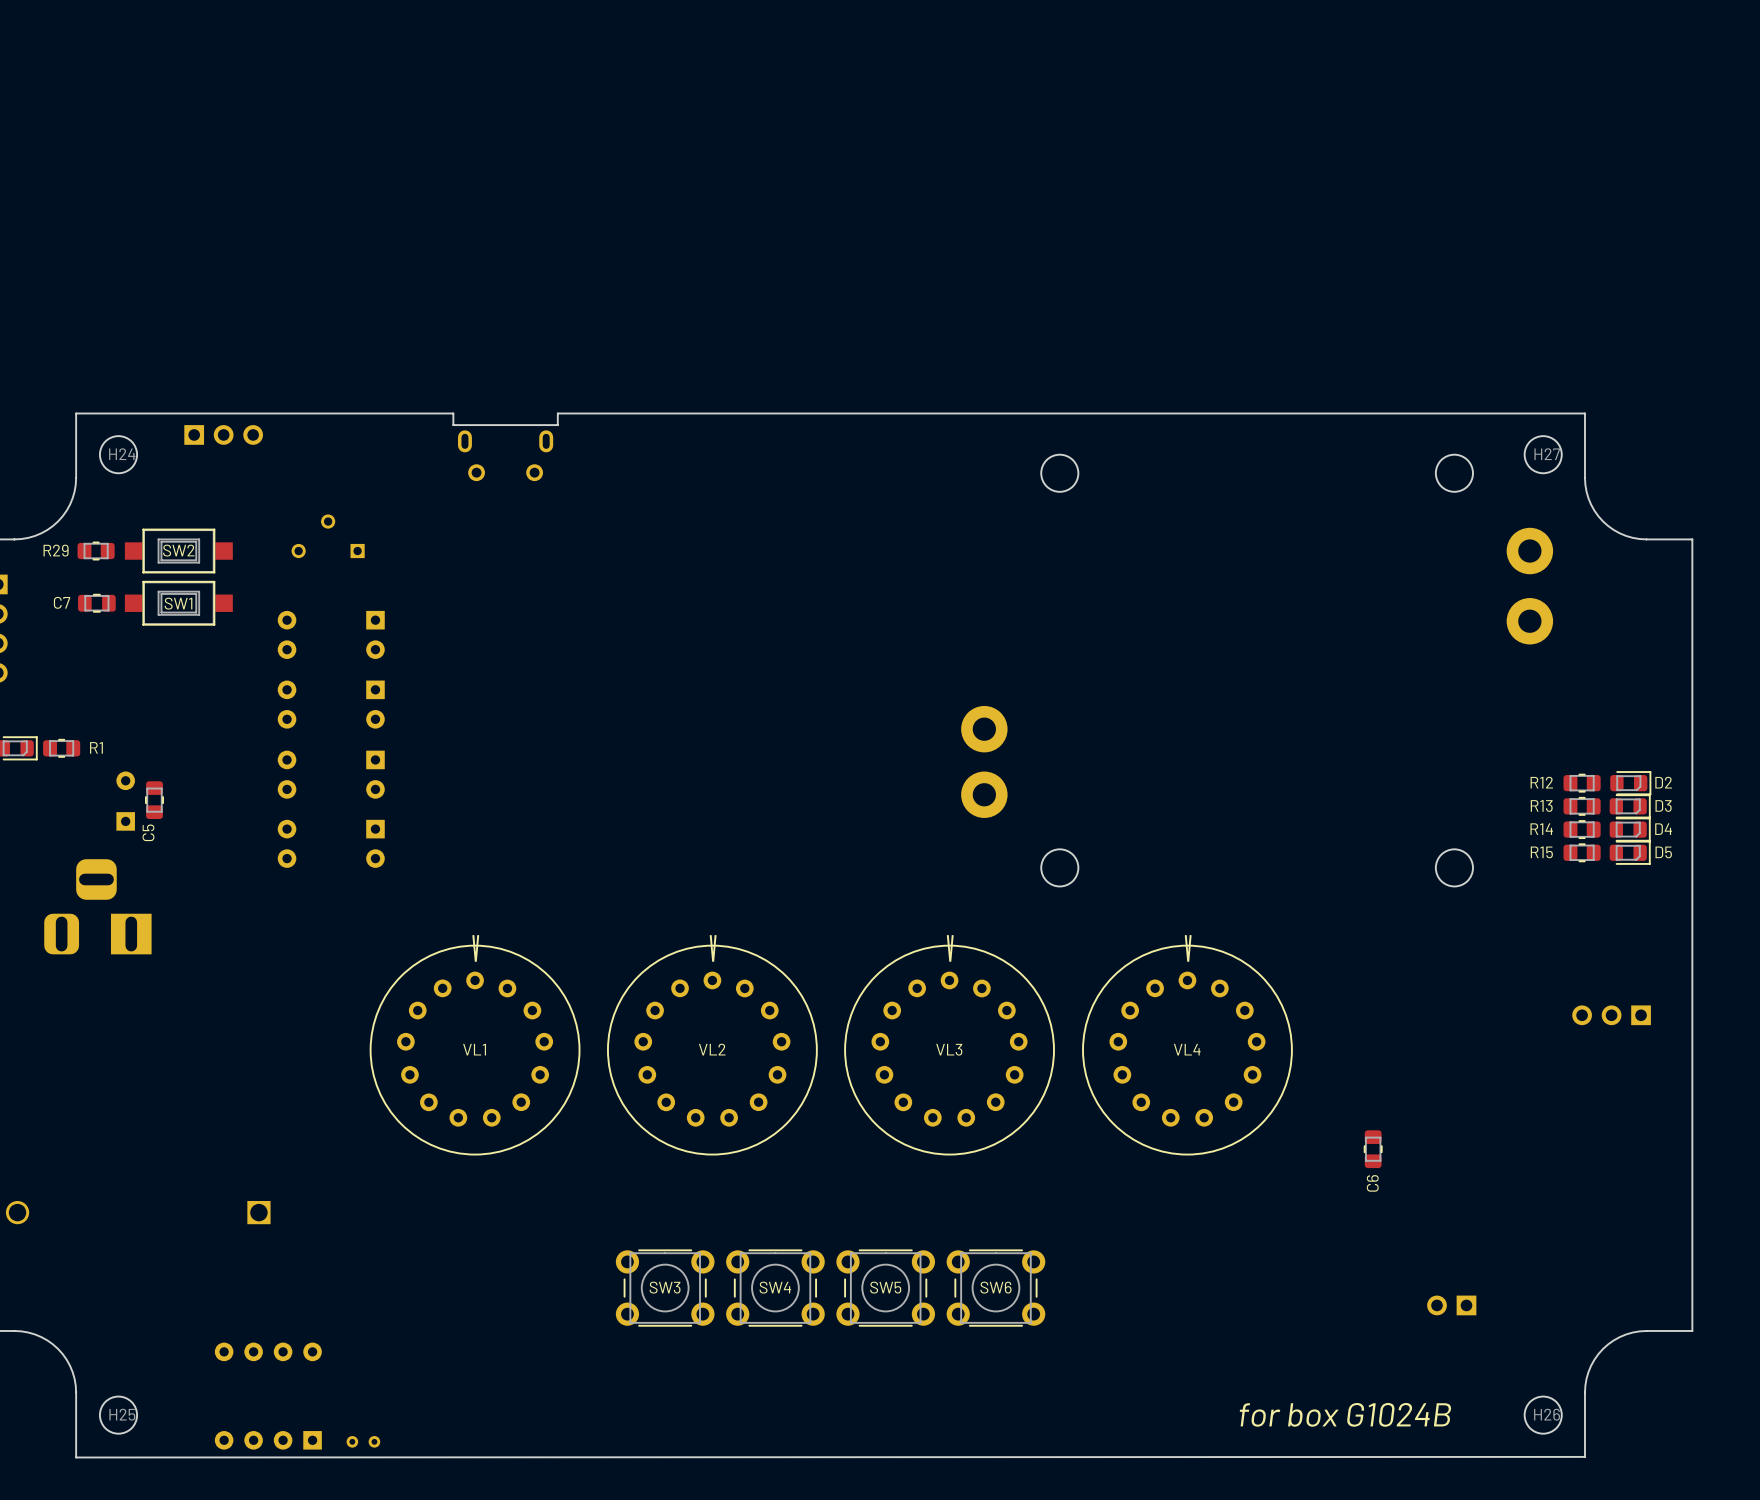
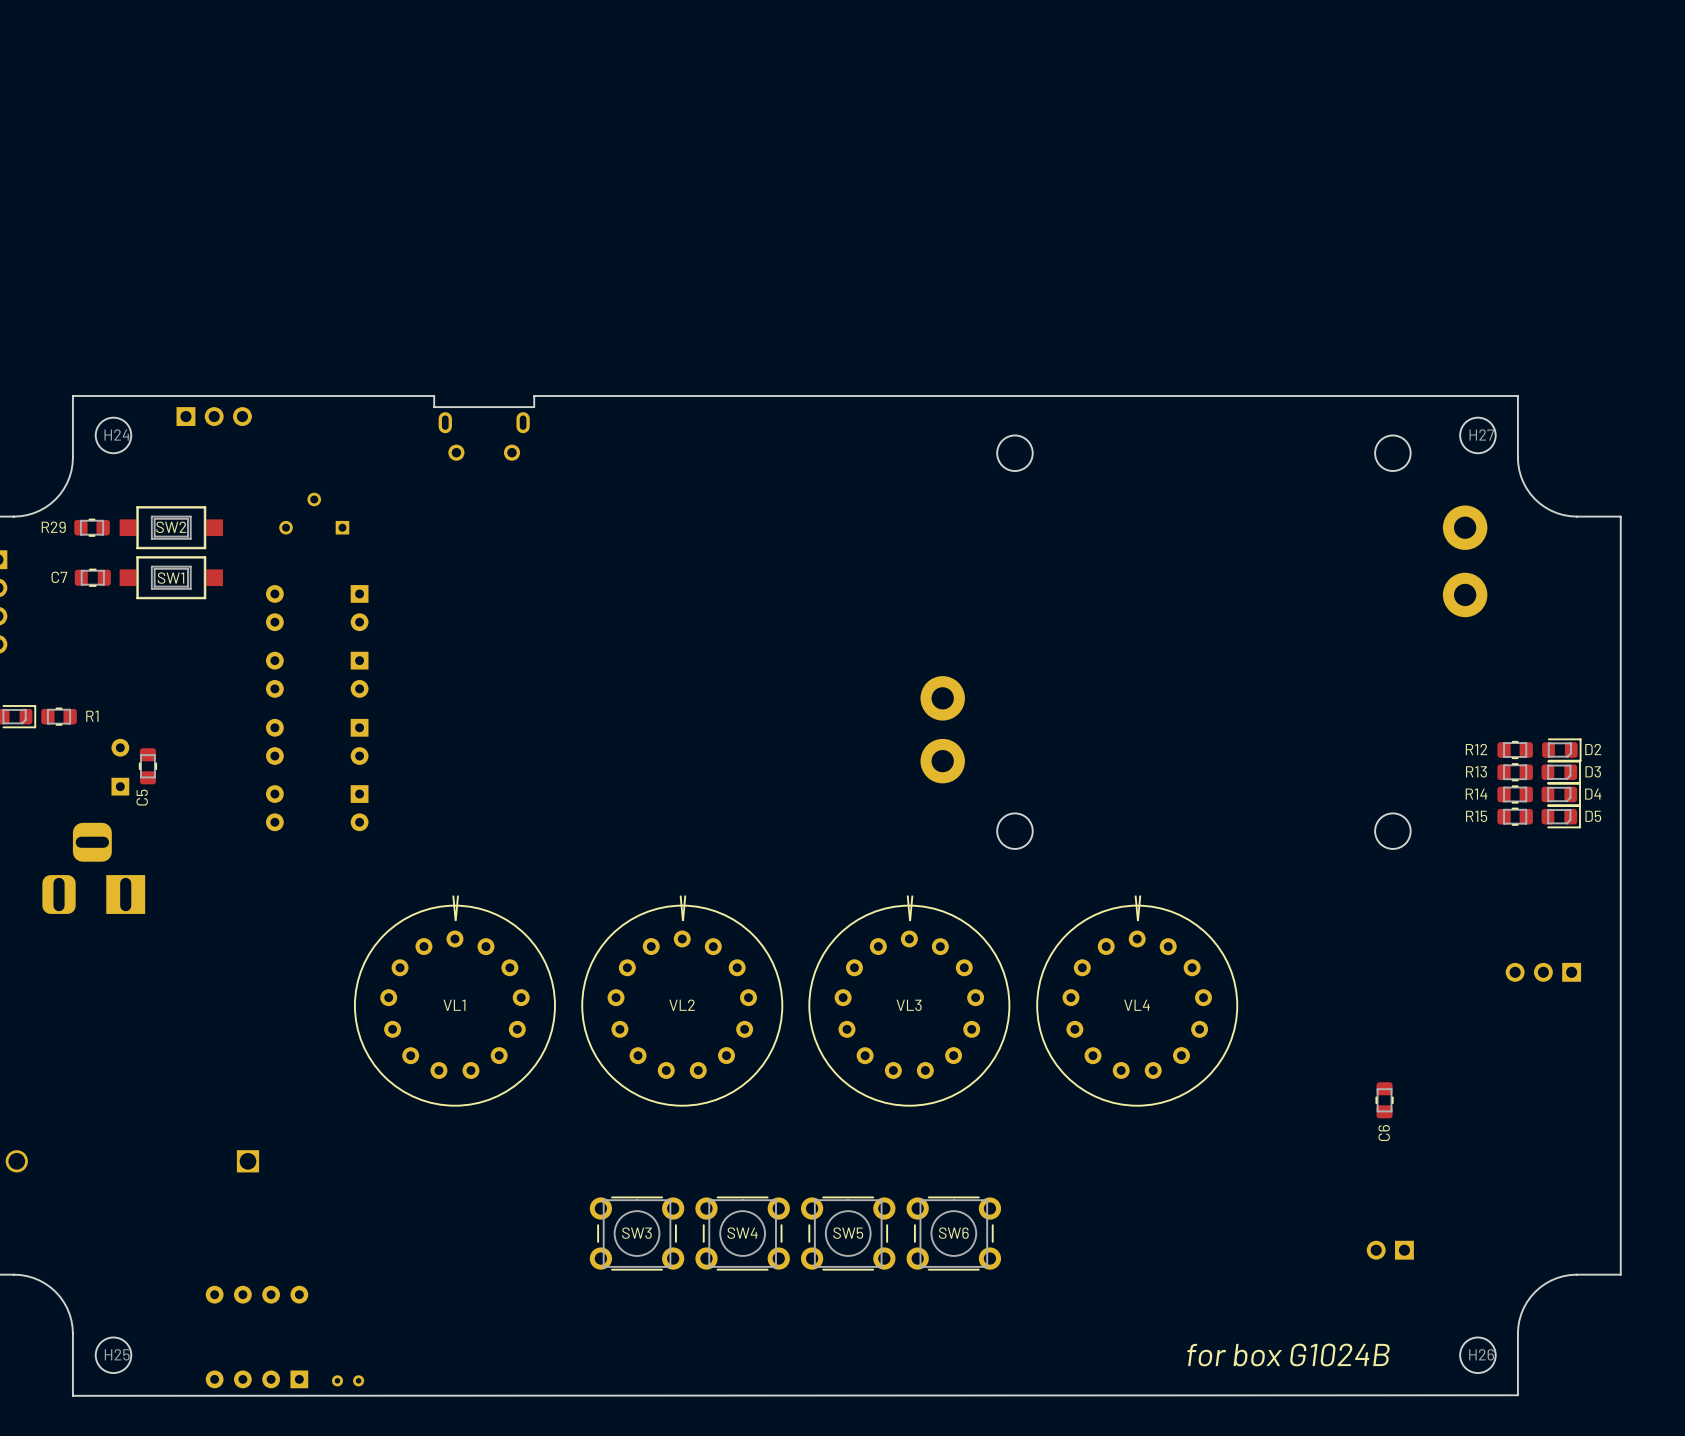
C6 position: (1373, 1149) -> (1384, 1100)

